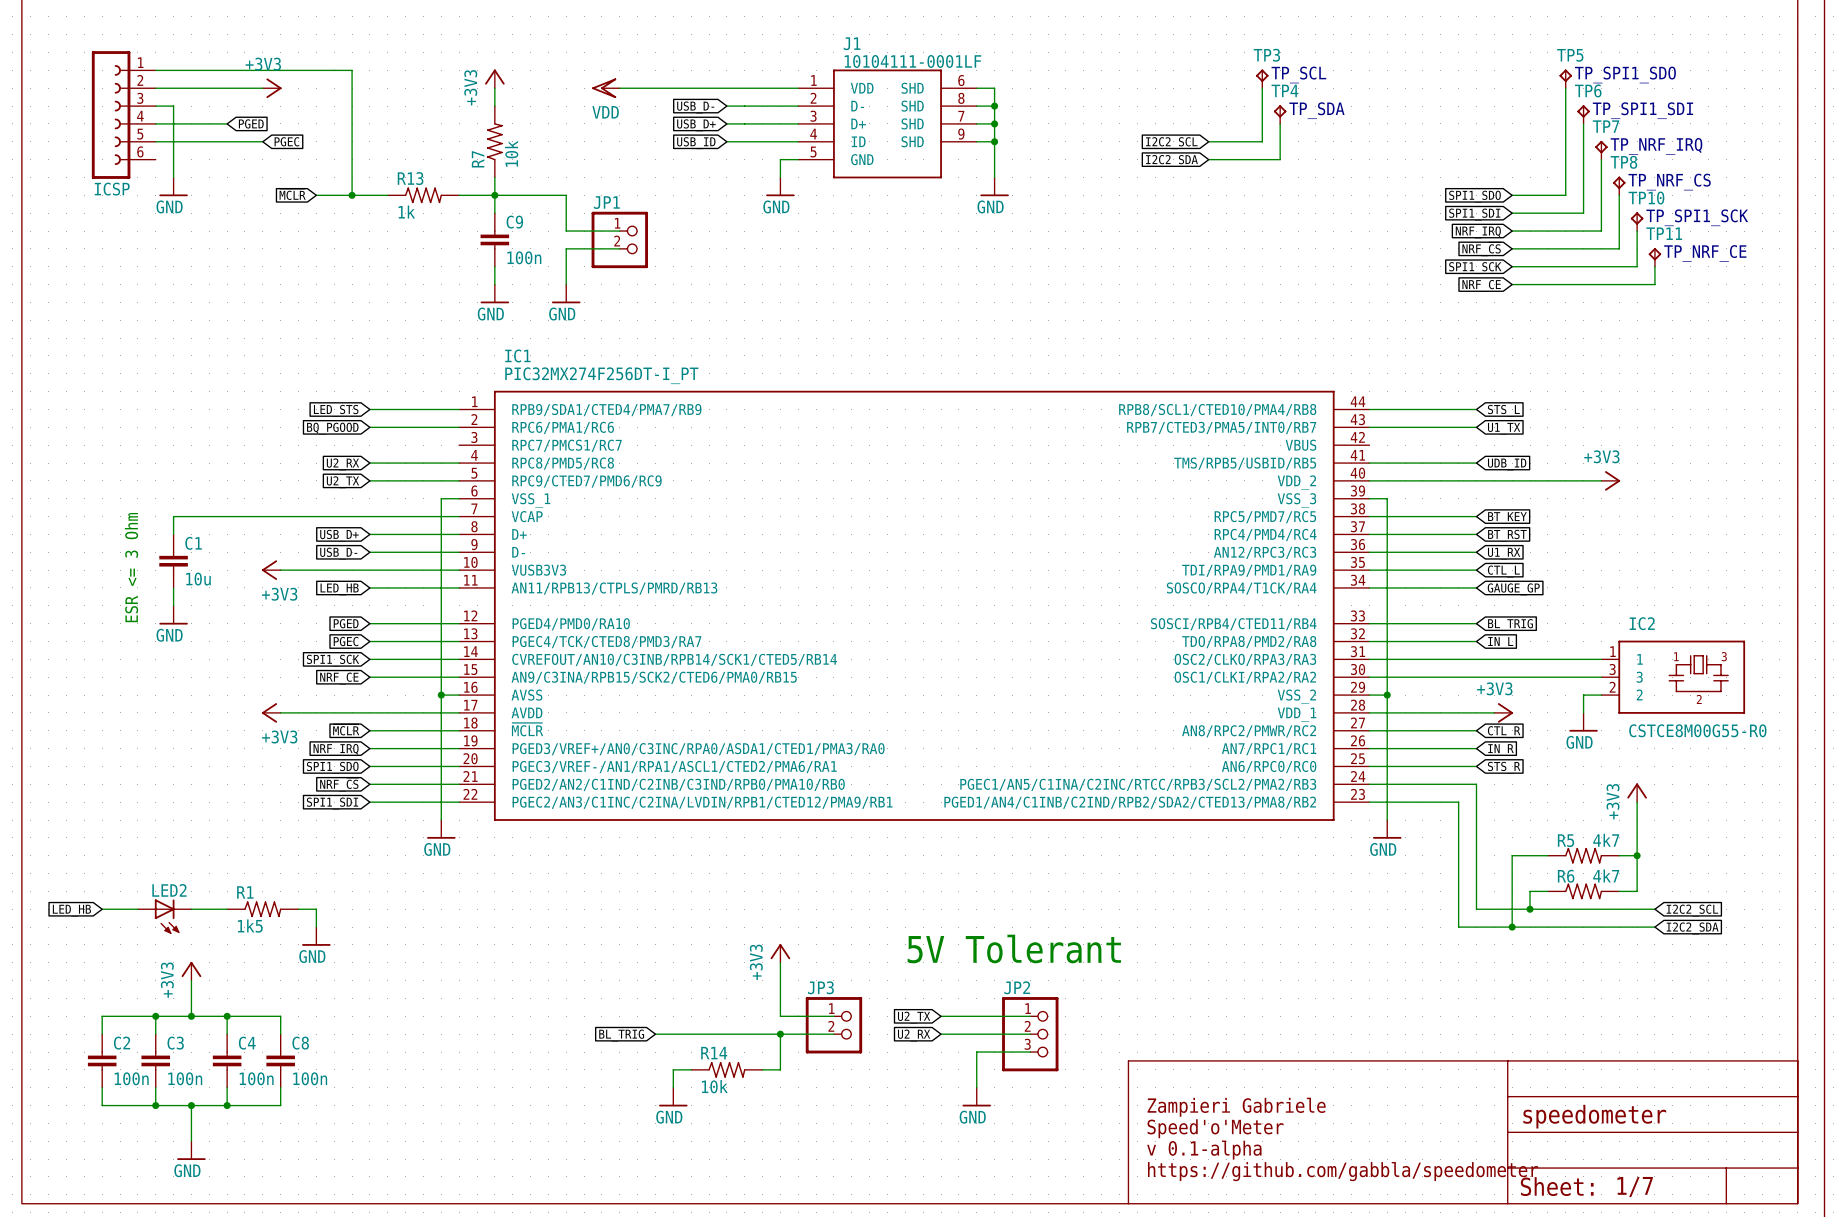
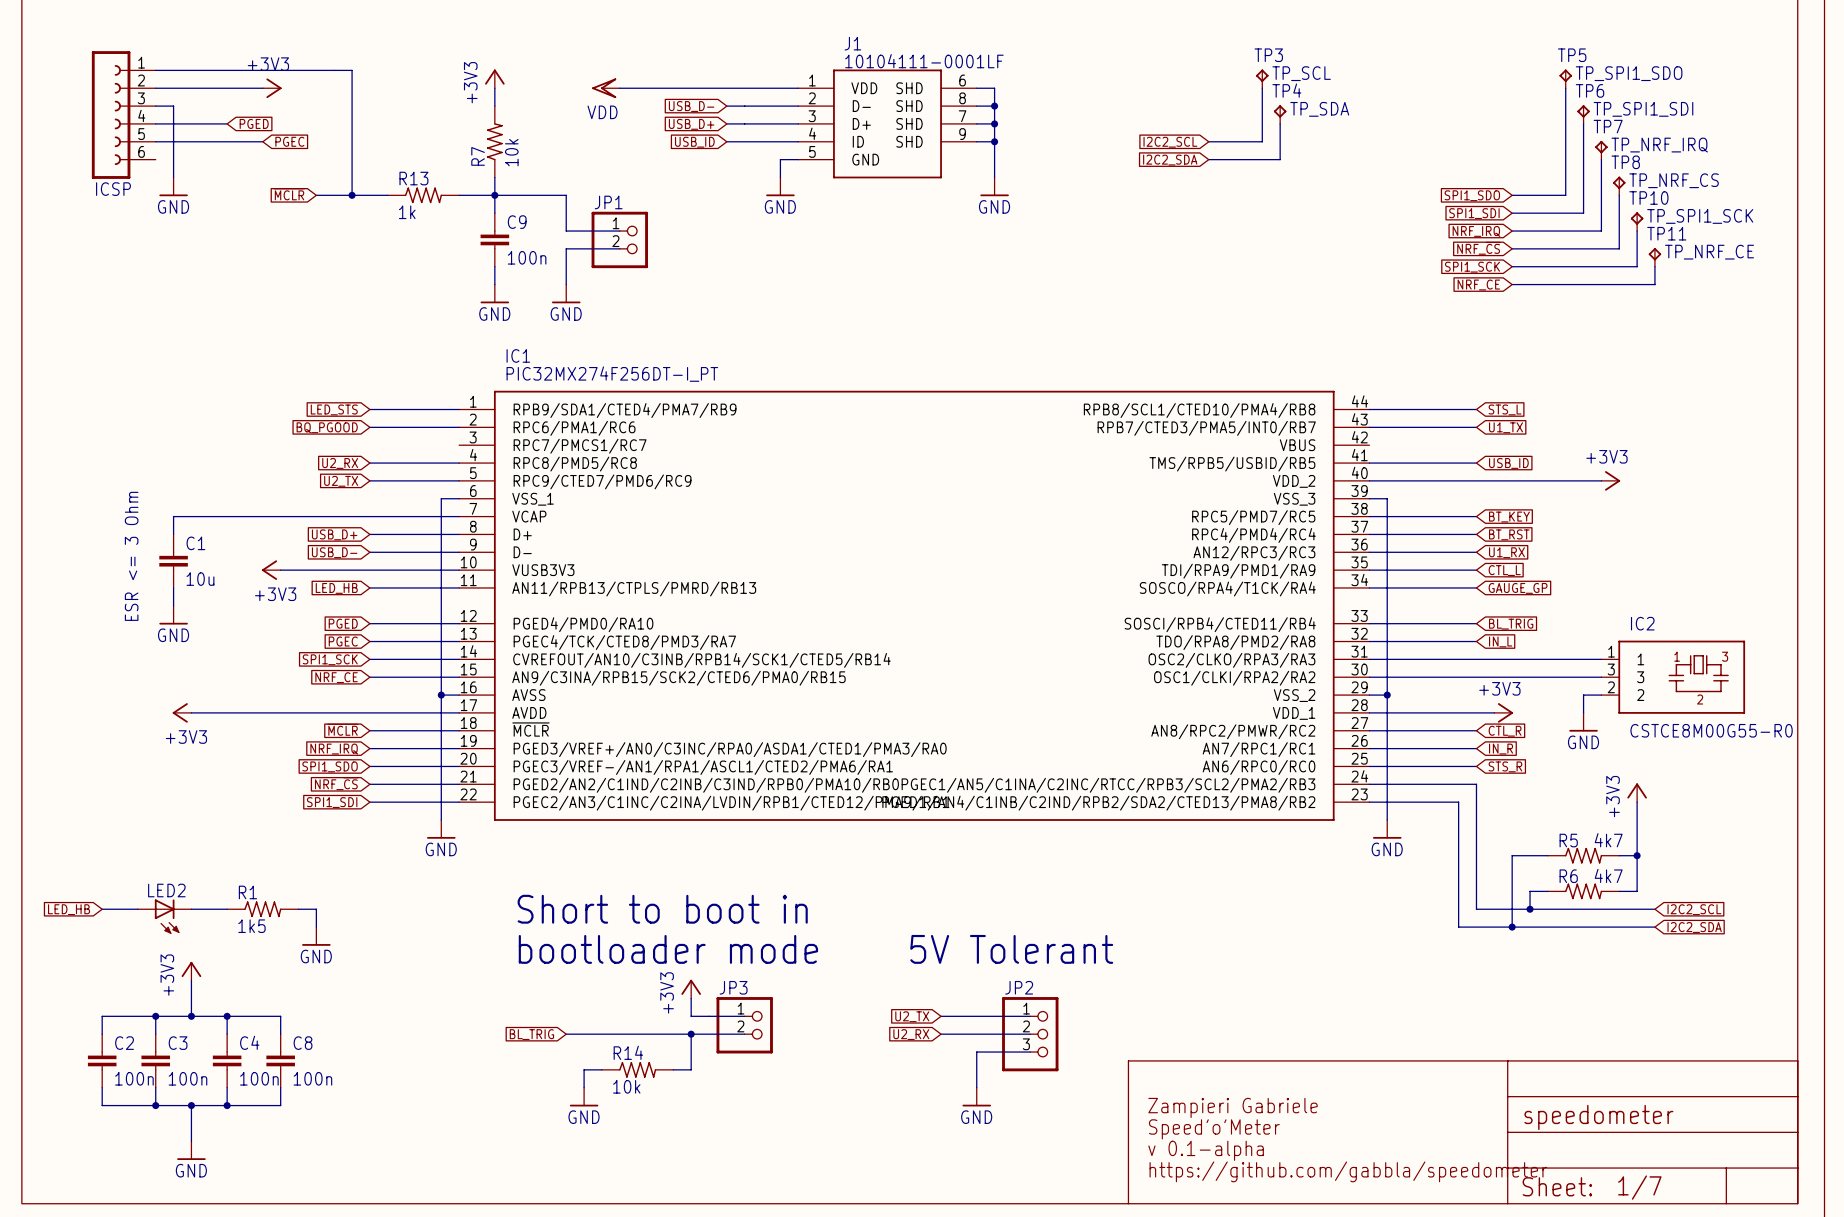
global label: UDB_ID (1507, 464) -> USB_ID (1508, 463)
wire: none -> (191, 712) (280, 712)
power symbol position: +3V3 (271, 712) -> +3V3 (182, 712)
text: none -> Short to boot in (662, 909)
text: none -> bootloader mode (668, 949)
power symbol position: +3V3 (780, 953) -> +3V3 (691, 989)
wire: (780, 962) (780, 1016) (833, 1016) -> none
wire: none -> (691, 998) (691, 1016) (744, 1016)
JP3 position: (833, 1025) -> (744, 1025)
wire: none -> (566, 1034) (655, 1034)
wire: none -> (691, 1034) (691, 1069)
junction: none -> (691, 1034)
wire: (744, 1034) (833, 1034) -> none
wire: (780, 1034) (780, 1069) (762, 1069) -> none
junction: (780, 1034) -> none
global label position: BL_TRIG (621, 1035) -> BL_TRIG (531, 1034)
wire: none -> (601, 1069) (584, 1069) (584, 1087)
wire: (673, 1069) (673, 1087) -> none
R14 position: (726, 1069) -> (637, 1069)
power symbol position: GND (673, 1097) -> GND (584, 1097)

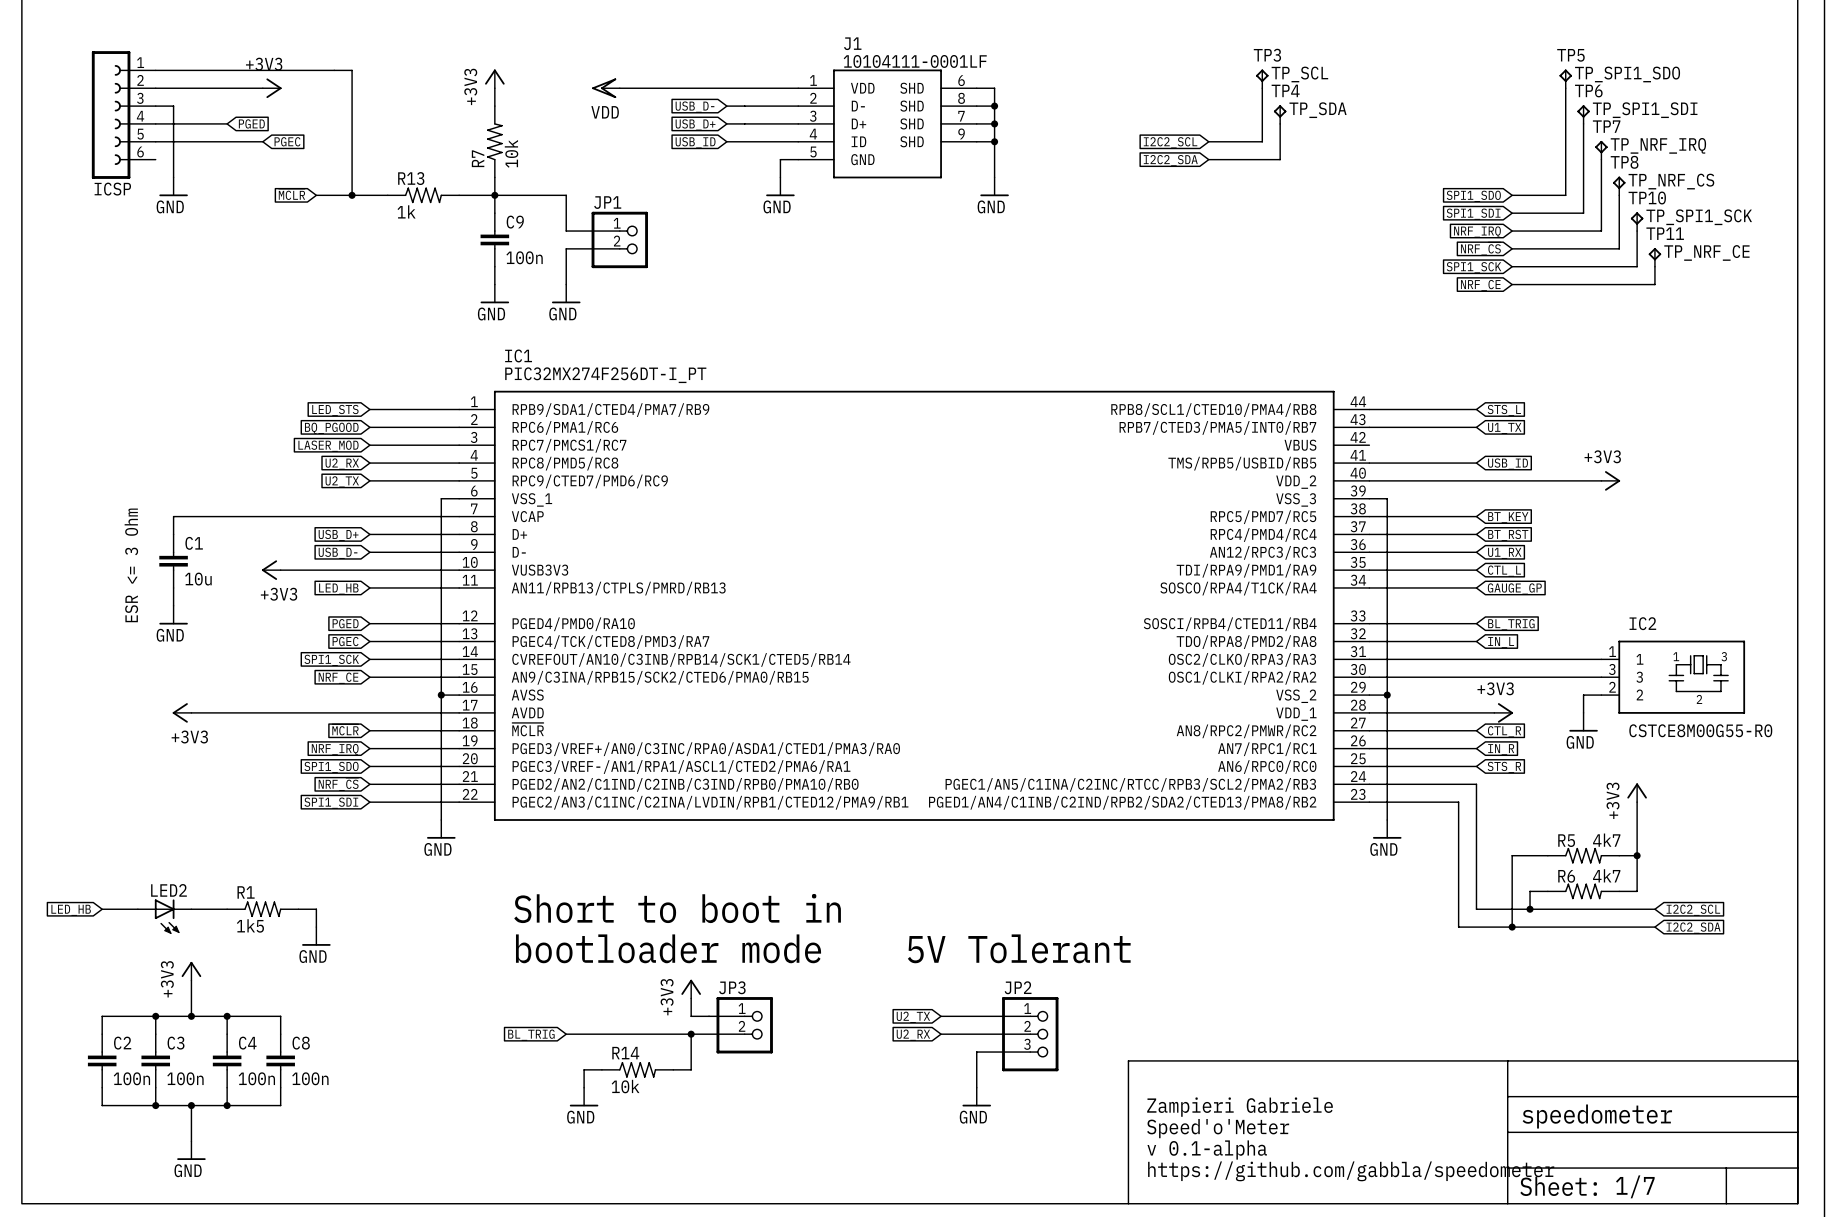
global label: none -> LASER_MOD (328, 446)
wire: none -> (369, 445) (459, 445)

